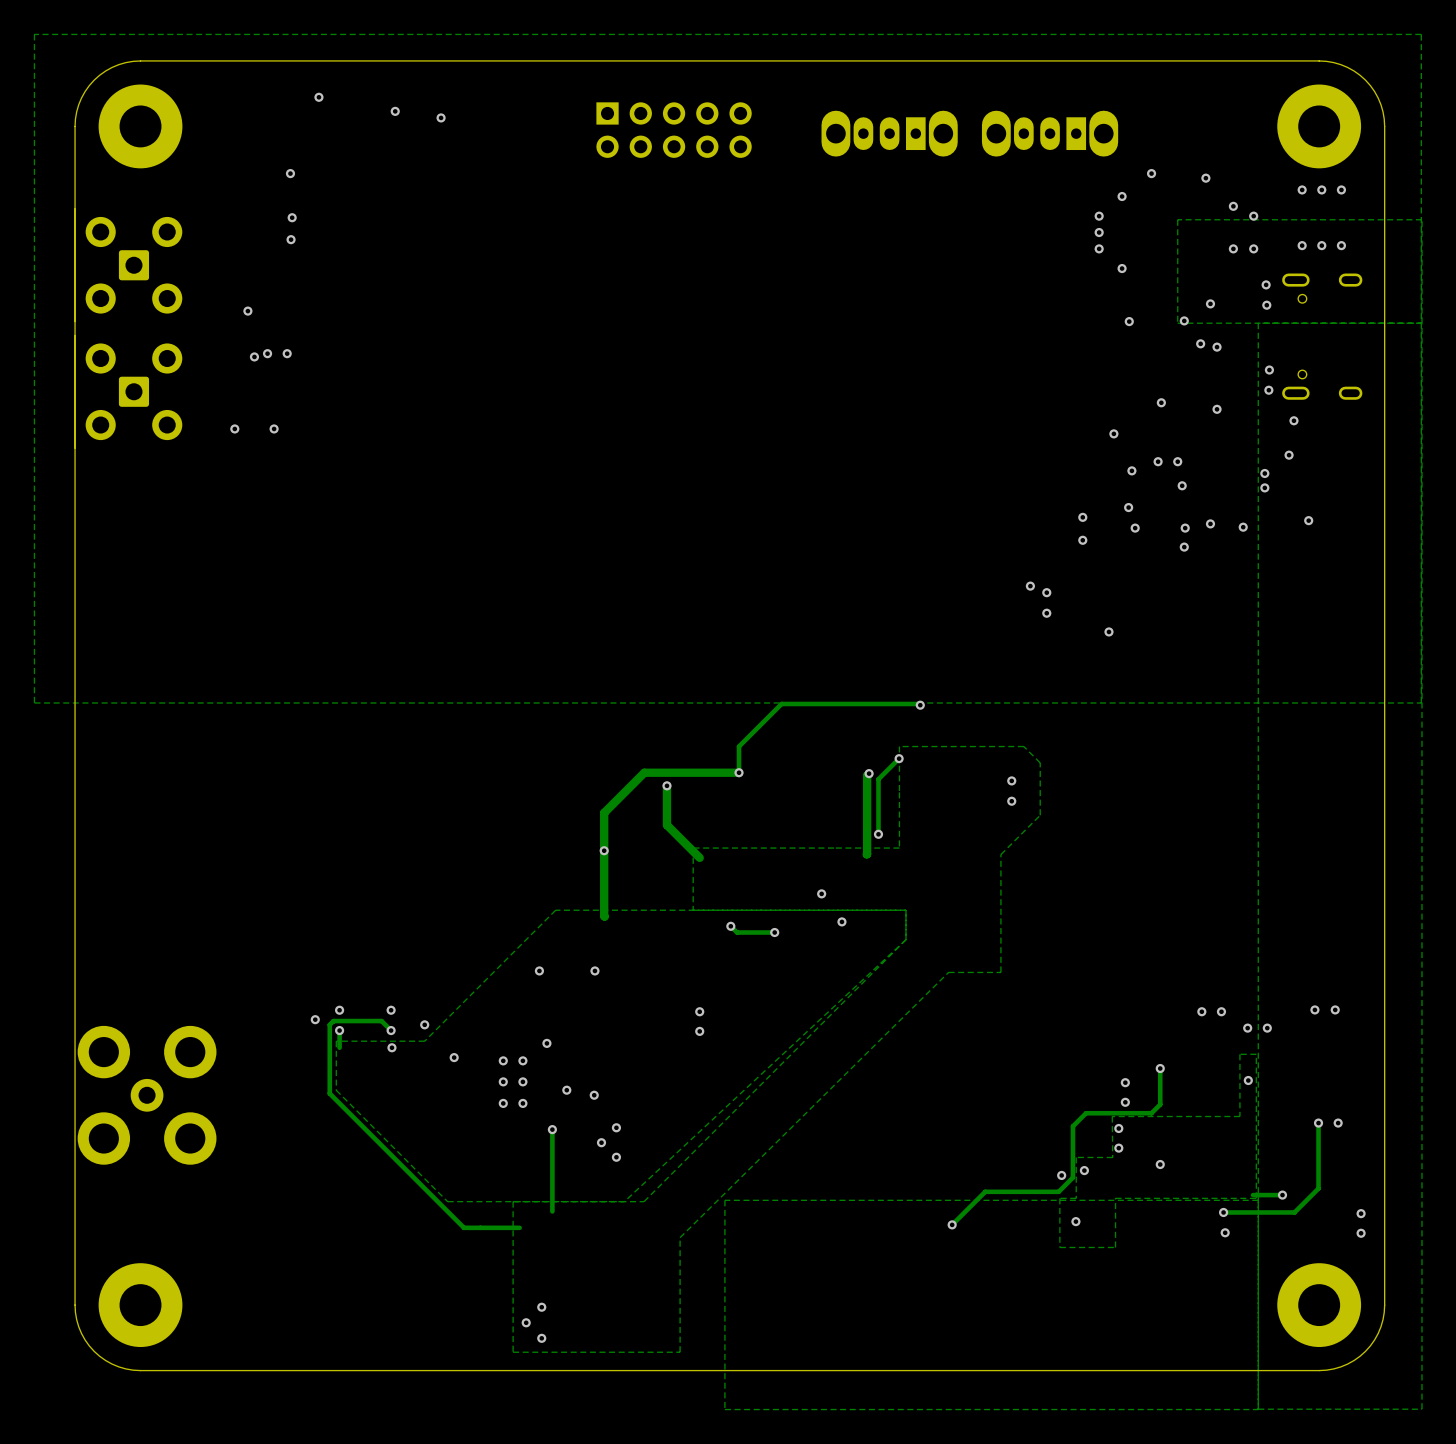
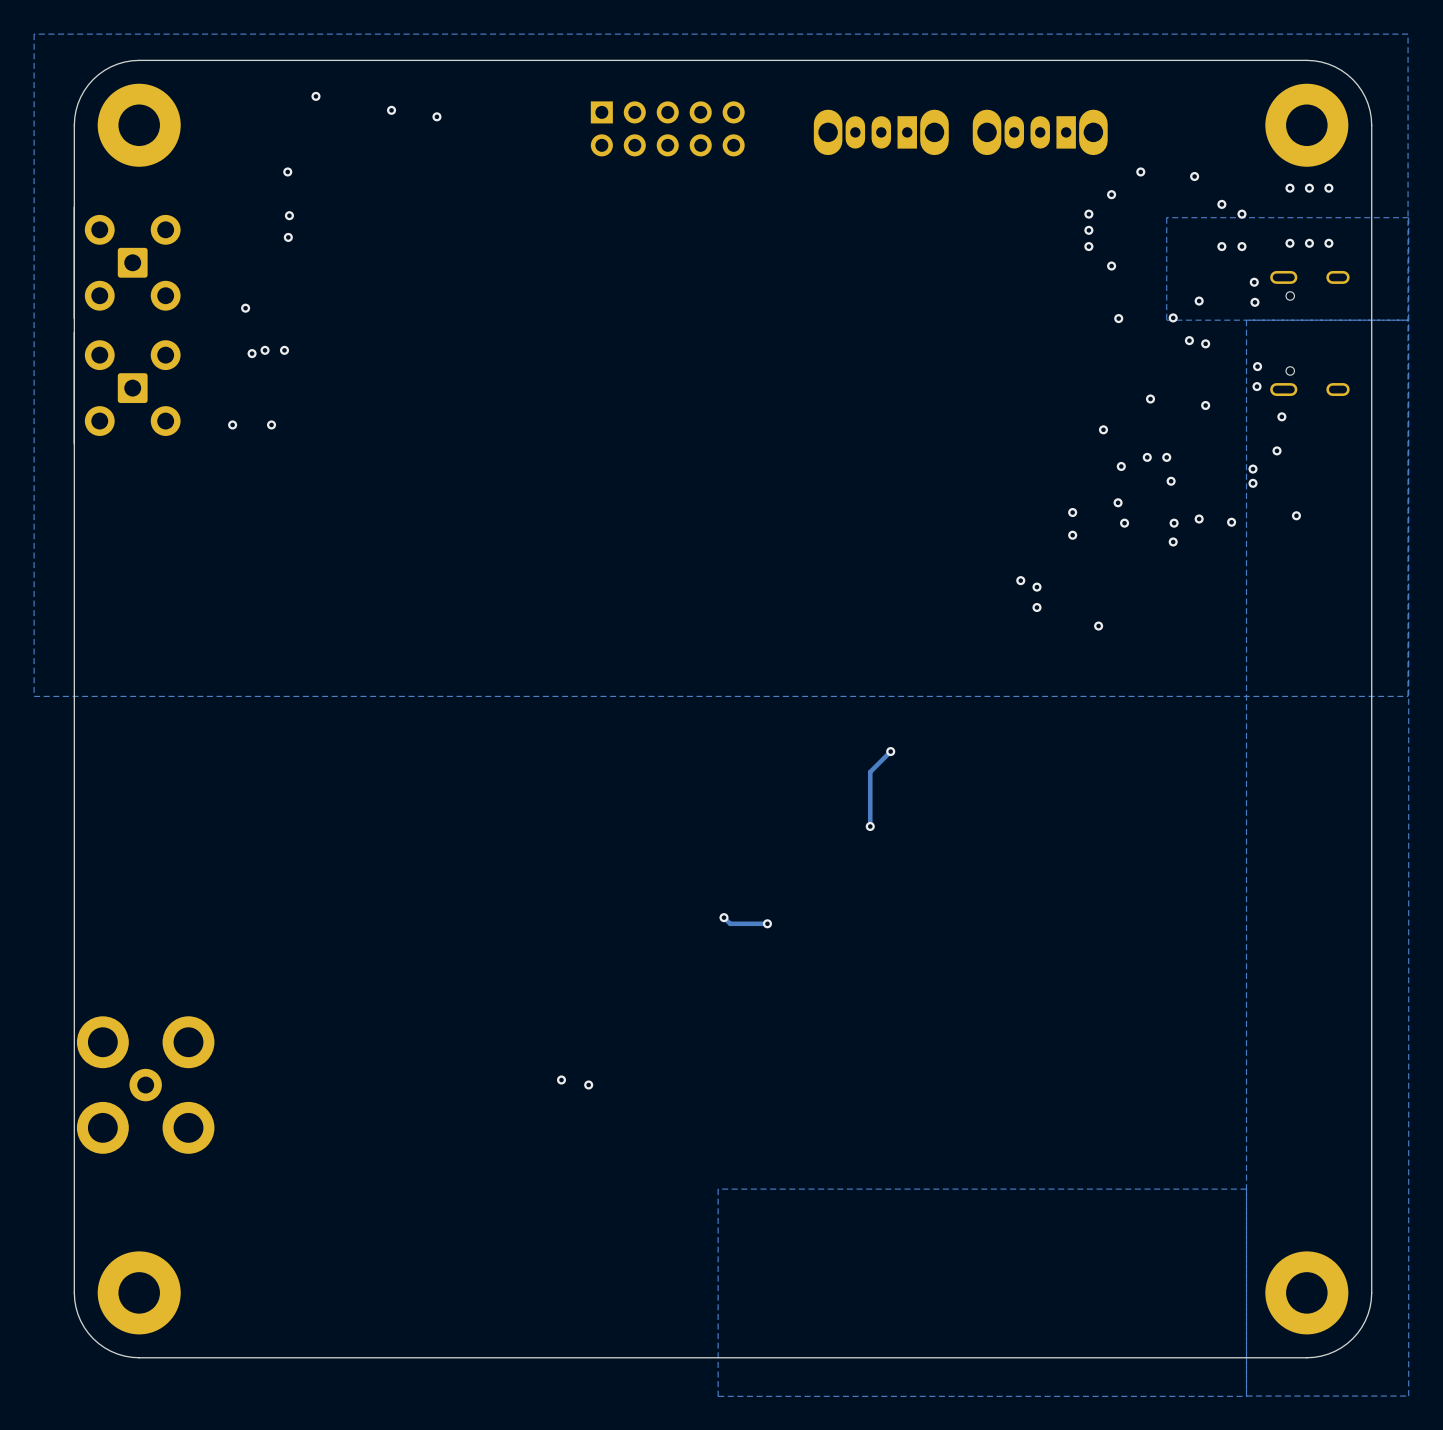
track: (920, 705) (781, 703) (739, 746) (739, 772) (644, 772) (604, 812) (604, 916) -> none
via: (920, 705) -> none
via: (739, 772) -> none
track: (869, 773) (867, 775) (866, 854) -> none
via: (869, 773) -> none
via: (1011, 780) -> none
track: (666, 785) (666, 825) (699, 857) -> none
via: (666, 785) -> none
via: (1011, 801) -> none
via: (604, 850) -> none
via: (821, 893) -> none
zone outline: (693, 910) (693, 848) (899, 848) (899, 746) (1023, 746) (1040, 762) (1040, 815) (1000, 854) (1000, 972) (948, 972) (680, 1237) (680, 1352) (513, 1352) (513, 1201) -> none
via: (841, 921) -> none
zone outline: (905, 939) (905, 910) (555, 910) (424, 1041) (336, 1041) (336, 1090) (447, 1201) (644, 1201) (905, 939) -> none
zone outline: (905, 939) (624, 1201) -> none
via: (539, 970) -> none
via: (594, 970) -> none
via: (1314, 1009) -> none
via: (1335, 1009) -> none
via: (339, 1010) -> none
via: (391, 1010) -> none
via: (699, 1011) -> none
via: (1201, 1011) -> none
via: (1221, 1011) -> none
via: (315, 1019) -> none
via: (424, 1024) -> none
via: (1247, 1028) -> none
via: (1267, 1028) -> none
track: (339, 1030) (339, 1047) -> none
via: (339, 1030) -> none
track: (391, 1030) (381, 1021) (333, 1021) (329, 1024) (329, 1093) (463, 1227) (519, 1227) -> none
via: (391, 1030) -> none
via: (699, 1031) -> none
via: (546, 1043) -> none
via: (391, 1047) -> none
zone outline: (1256, 1054) (1239, 1054) (1239, 1116) (1112, 1116) (1112, 1157) (1076, 1157) (1076, 1198) (1059, 1198) (1059, 1247) (1115, 1247) (1115, 1198) (1256, 1198) (1256, 1054) -> none
via: (454, 1057) -> none
via: (503, 1060) -> none
via: (522, 1060) -> none
track: (1160, 1068) (1160, 1104) (1151, 1113) (1086, 1113) (1072, 1126) (1072, 1177) (1058, 1191) (985, 1191) (952, 1224) -> none
via: (1160, 1068) -> none
via: (1248, 1080) -> none
via: (503, 1081) -> none
via: (522, 1081) -> none
via: (1125, 1082) -> none
via: (1125, 1102) -> none
via: (503, 1103) -> none
via: (522, 1103) -> none
track: (1318, 1123) (1318, 1188) (1294, 1212) (1223, 1211) -> none
via: (1318, 1123) -> none
via: (1338, 1123) -> none
via: (616, 1127) -> none
via: (1118, 1128) -> none
track: (552, 1129) (552, 1211) -> none
via: (552, 1129) -> none
via: (601, 1142) -> none
via: (1118, 1148) -> none
via: (616, 1157) -> none
via: (1160, 1164) -> none
via: (1084, 1170) -> none
via: (1061, 1175) -> none
track: (1282, 1195) (1253, 1195) -> none
via: (1282, 1195) -> none
via: (1223, 1212) -> none
via: (1361, 1213) -> none
via: (1075, 1221) -> none
via: (952, 1224) -> none
via: (1225, 1232) -> none
via: (1361, 1233) -> none
via: (541, 1307) -> none
via: (526, 1322) -> none
via: (541, 1338) -> none

